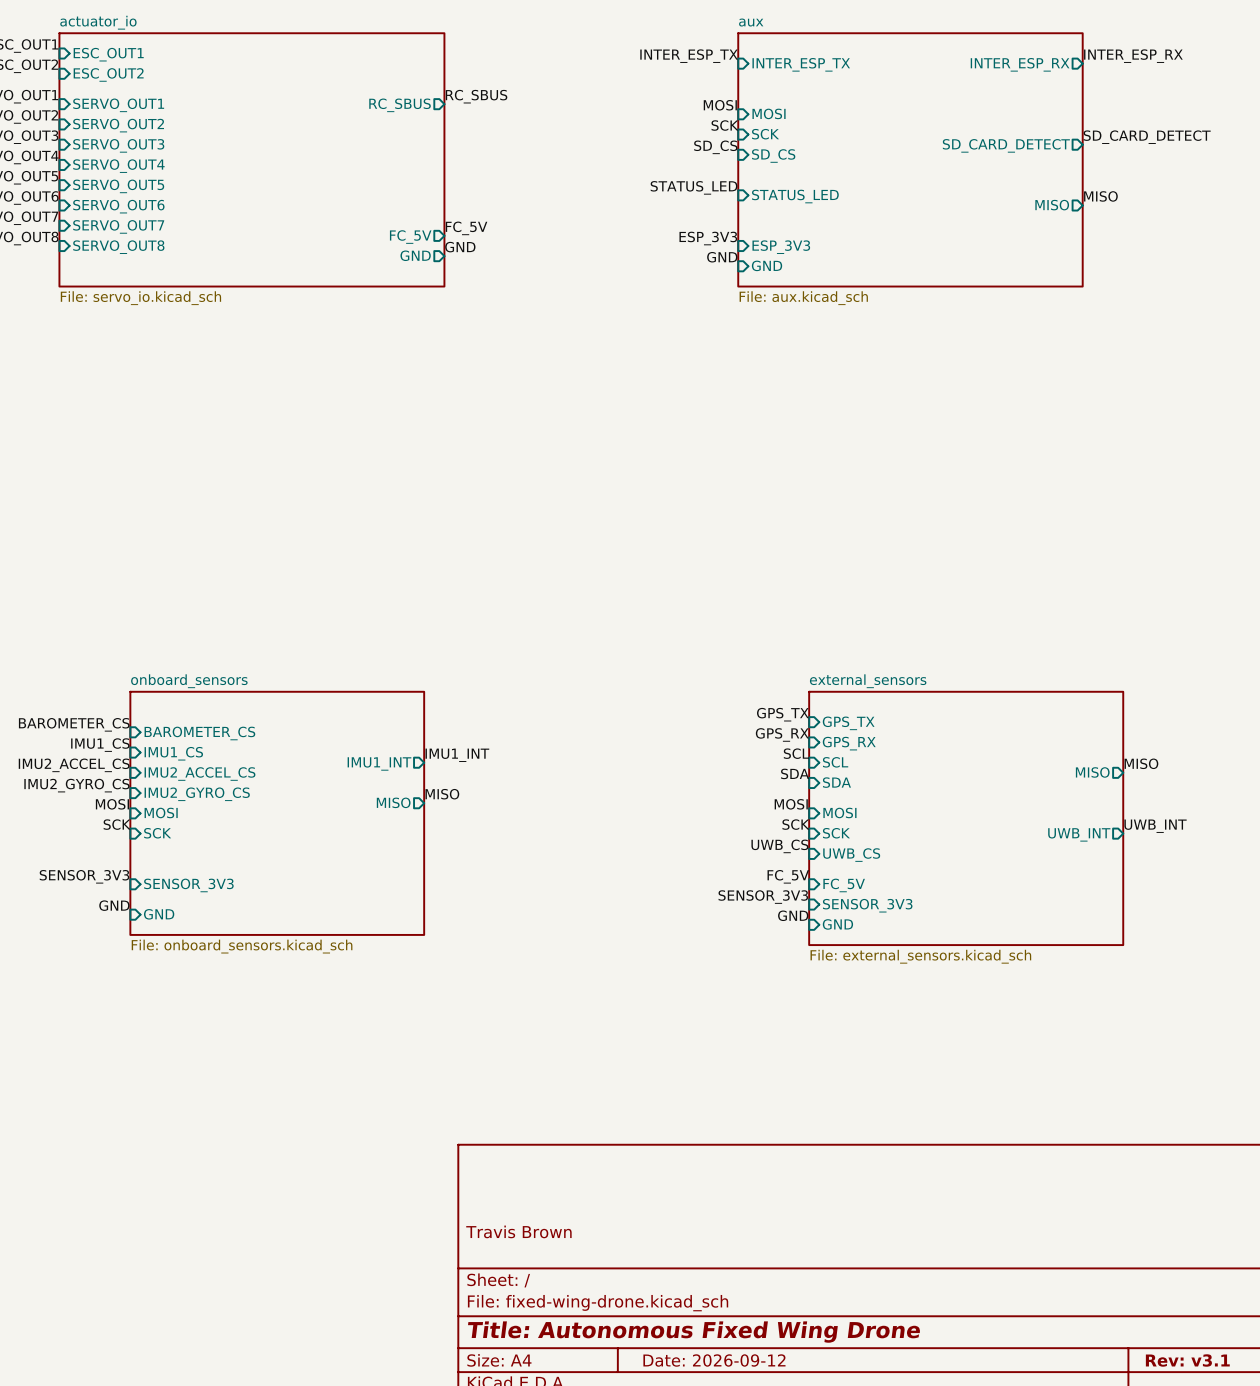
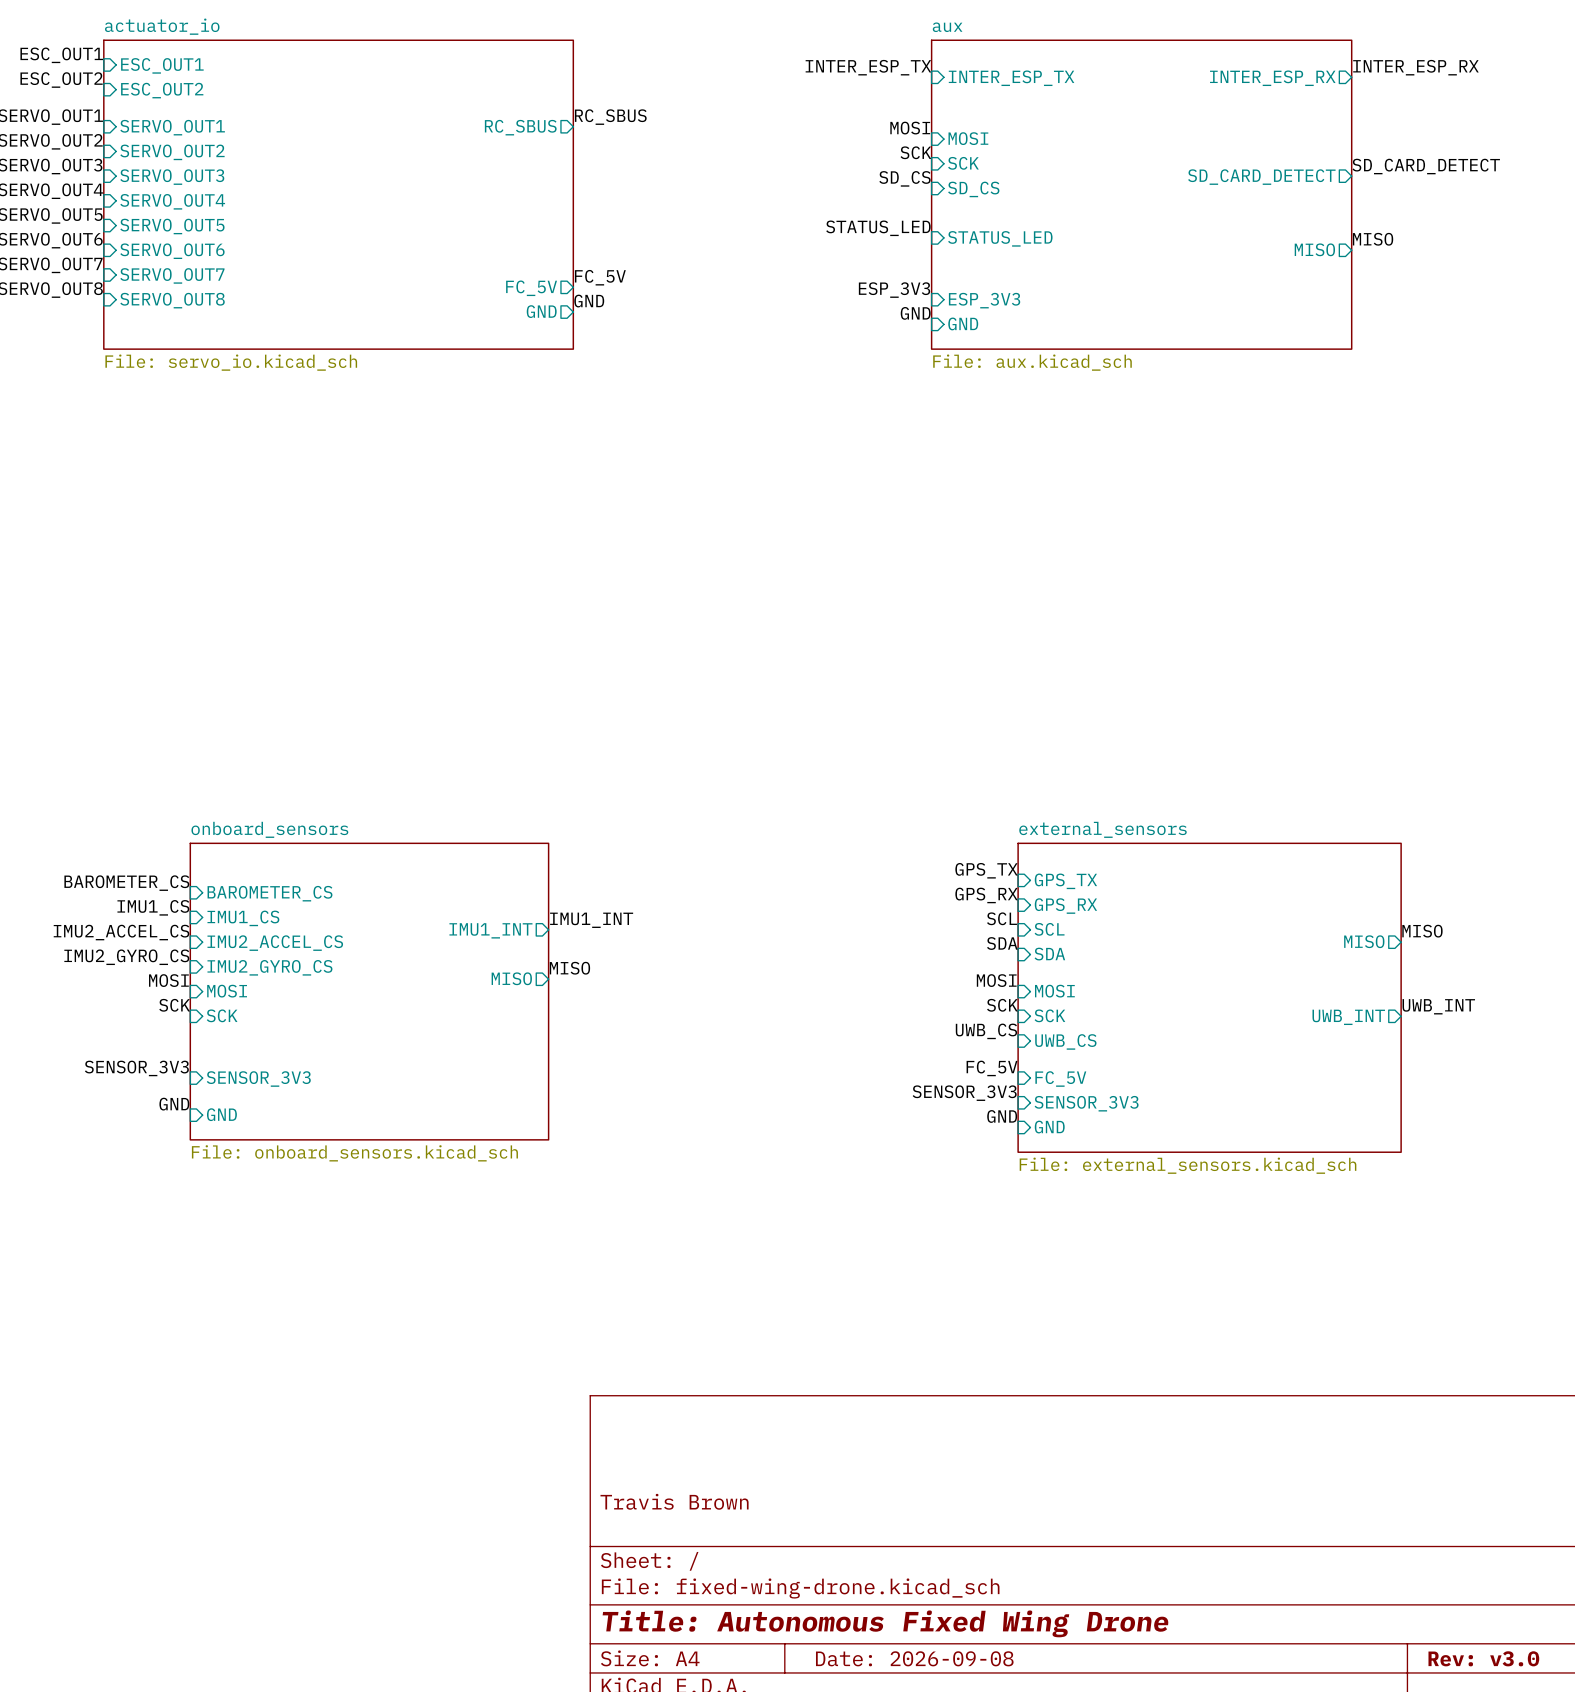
title block: Date: 2026-09-12 (714, 1360) -> Date: 2026-09-08 (914, 1658)
title block: Rev: v3.1 (1187, 1360) -> Rev: v3.0 (1483, 1658)

